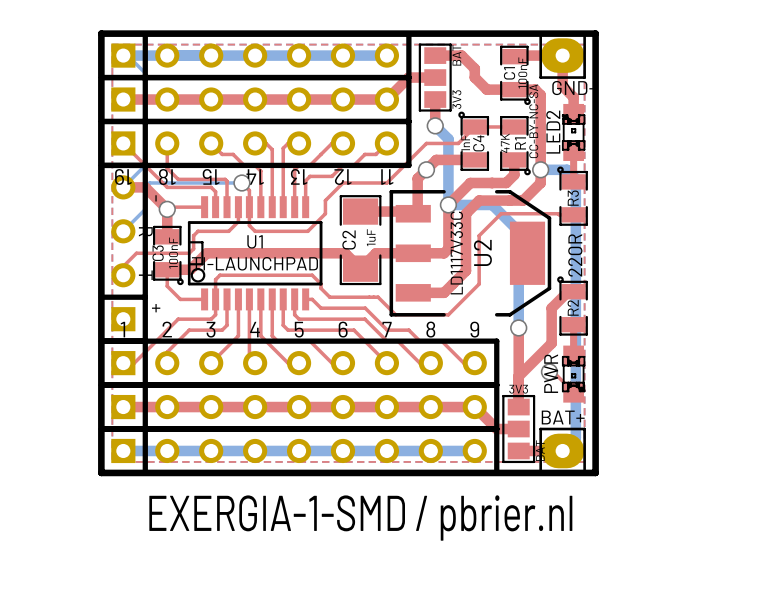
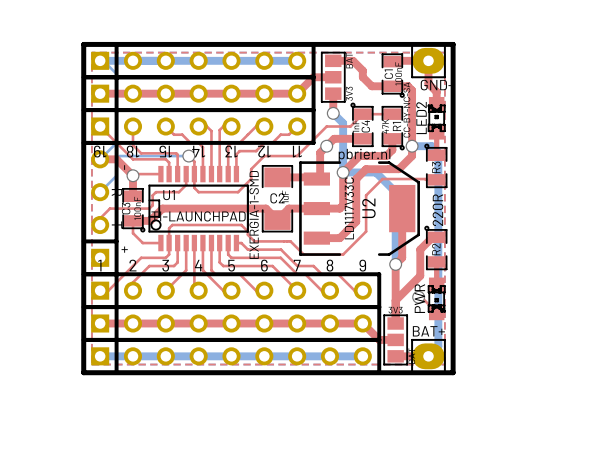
text: none -> pbrier.nl (364, 155)
C2 name rotation: 0° (349, 239) -> 90° clockwise (277, 198)
U1 name position: U1 (255, 241) -> U1 (169, 195)
top track: none -> (402, 208) (402, 257) (395, 264)
text: none -> EXERGIA-1-SMD (254, 214)
text: EXERGIA-1-SMD / pbrier.nl (360, 517) -> none

